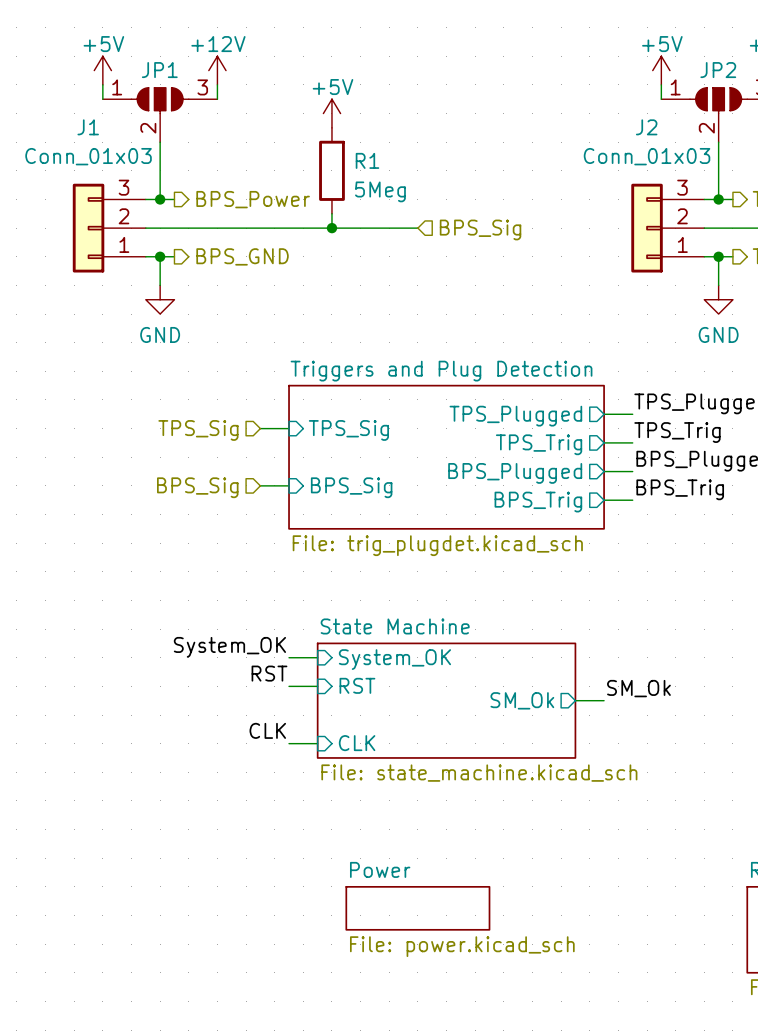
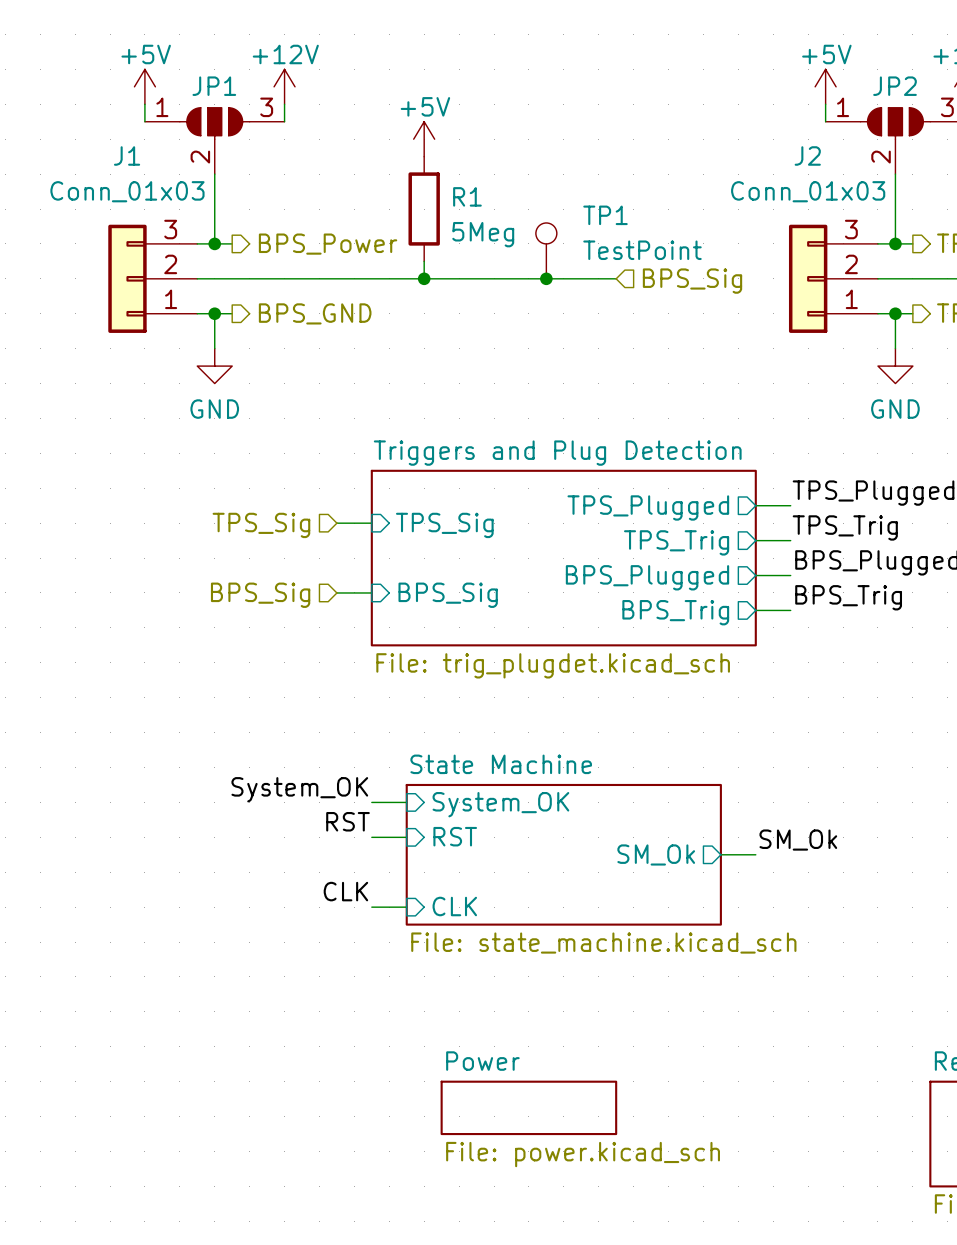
TP1: none -> TestPoint (546, 250)
wire: none -> (528, 278) (616, 278)
junction: none -> (546, 278)
hierarchical label position: BPS_Sig (480, 229) -> BPS_Sig (692, 281)

